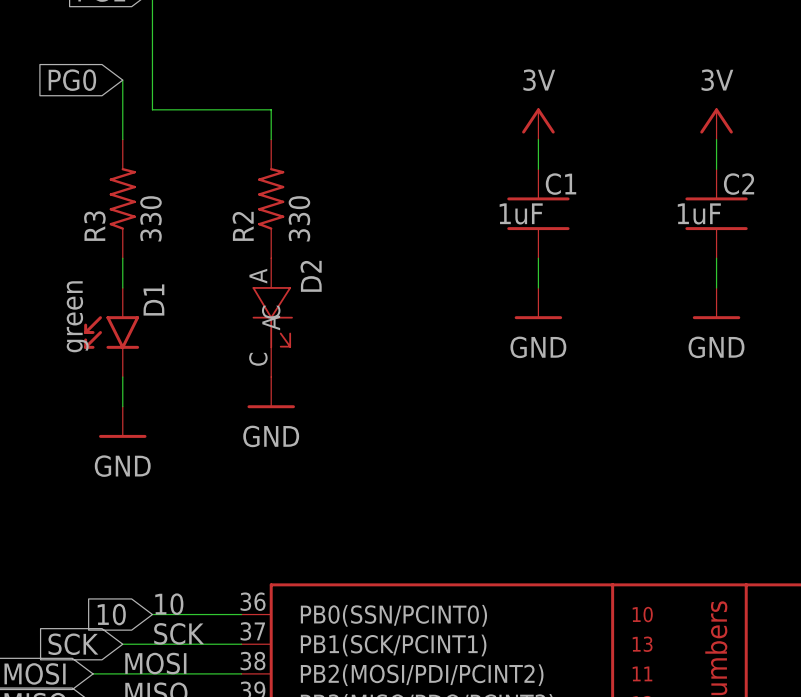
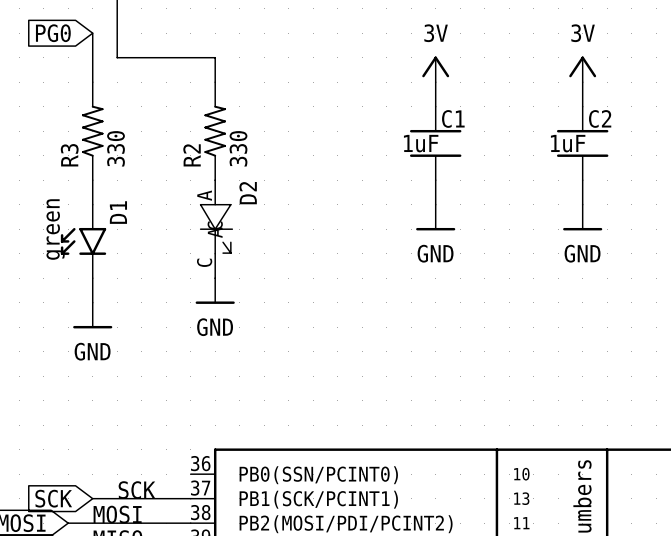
label: 10 (169, 604) -> none
global label: 10 (111, 614) -> none
wire: (152, 614) (241, 614) -> none

